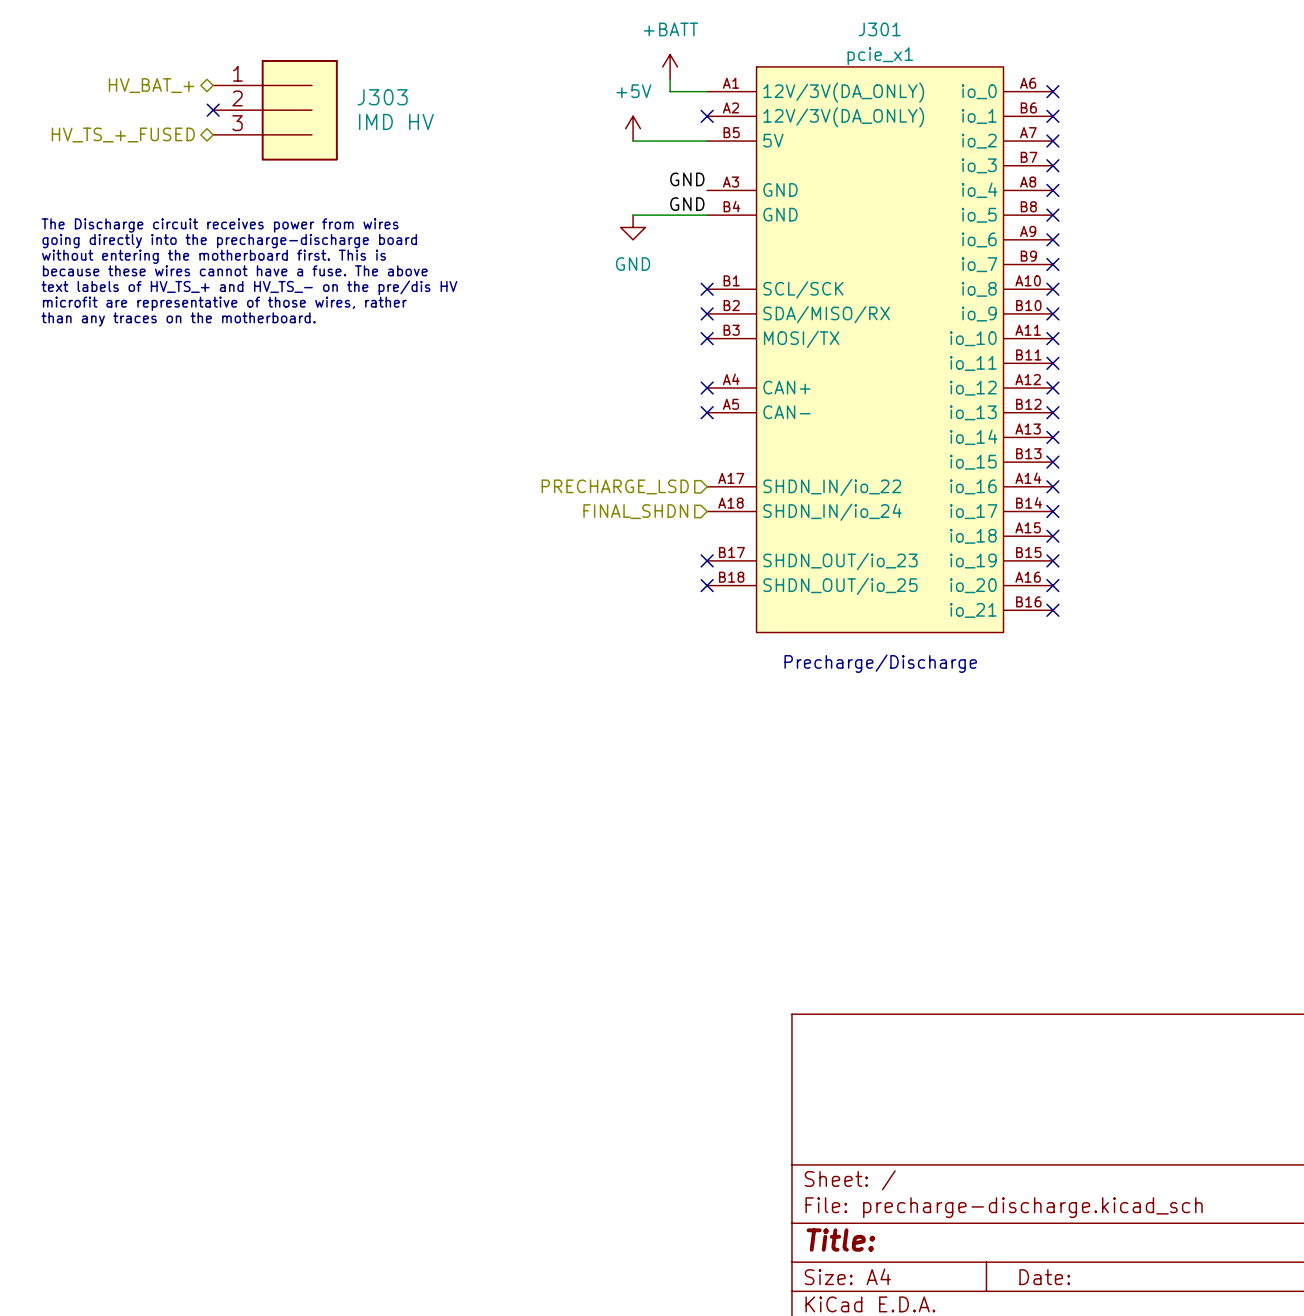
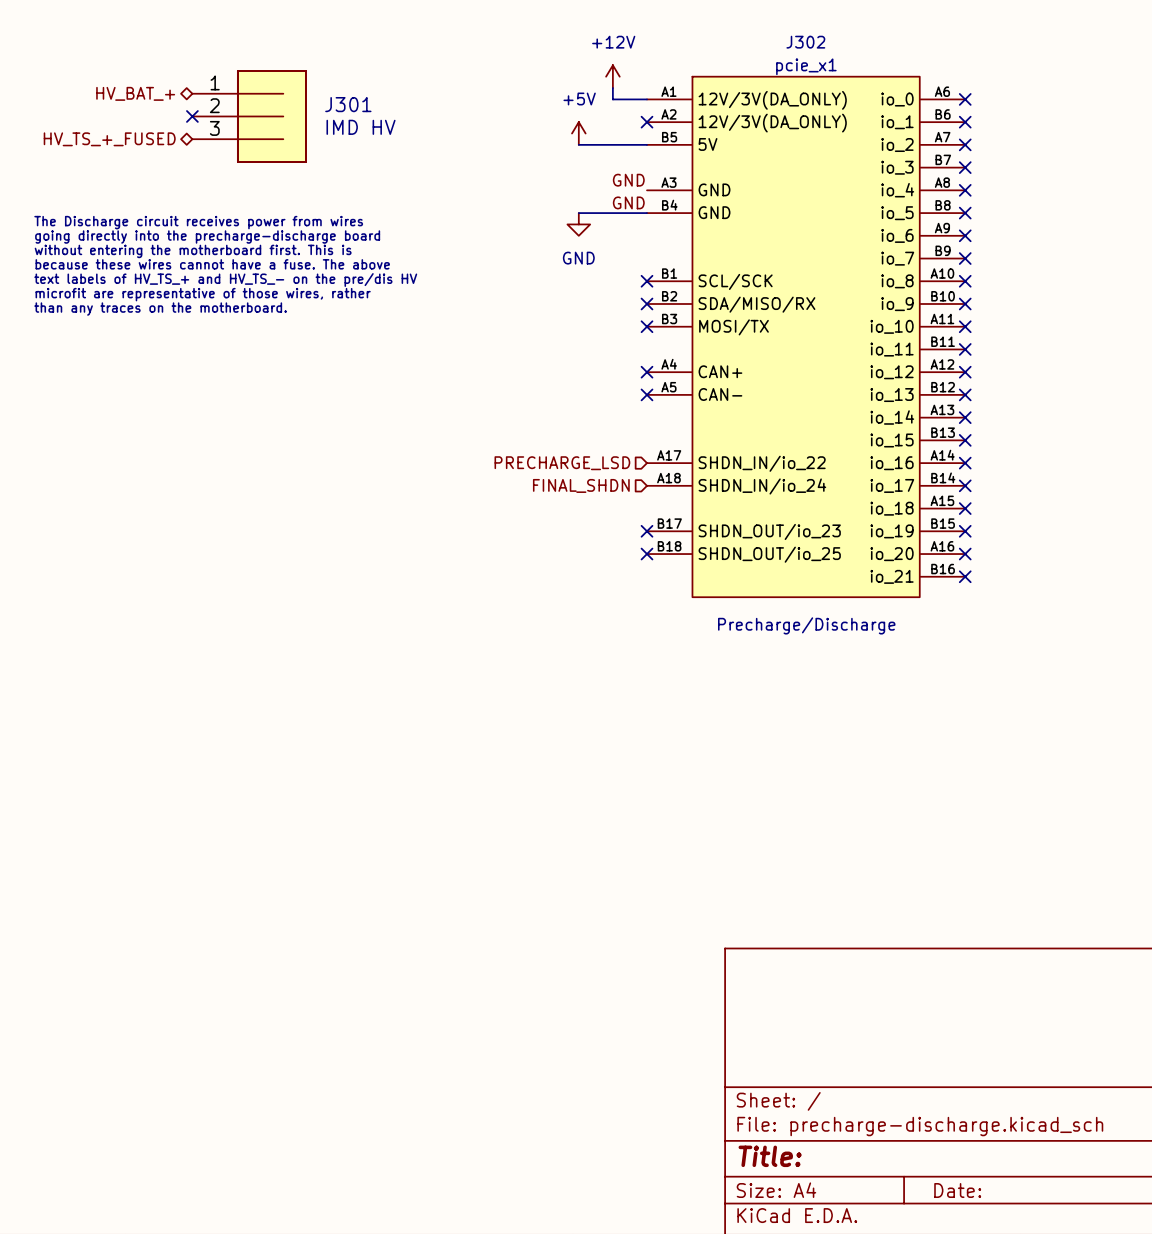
J301 name: J301 (879, 29) -> J302 (805, 42)
power symbol: +BATT (670, 66) -> +12V (612, 76)
J303 name: J303 (382, 97) -> J301 (348, 104)

